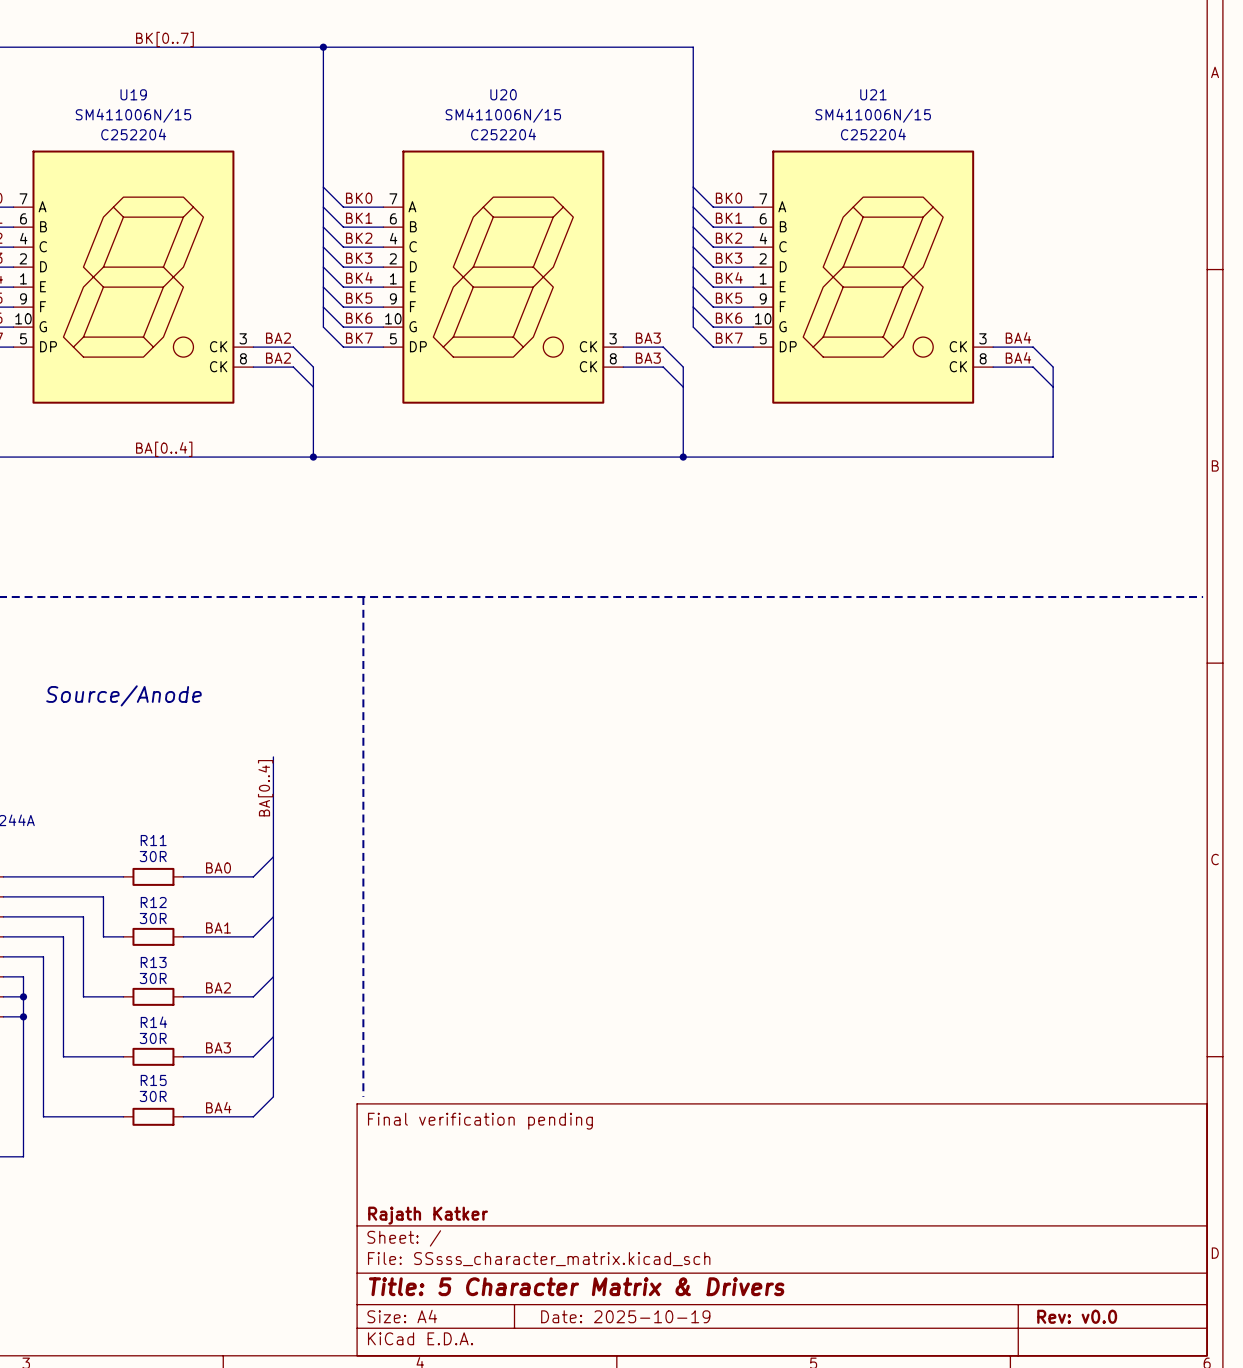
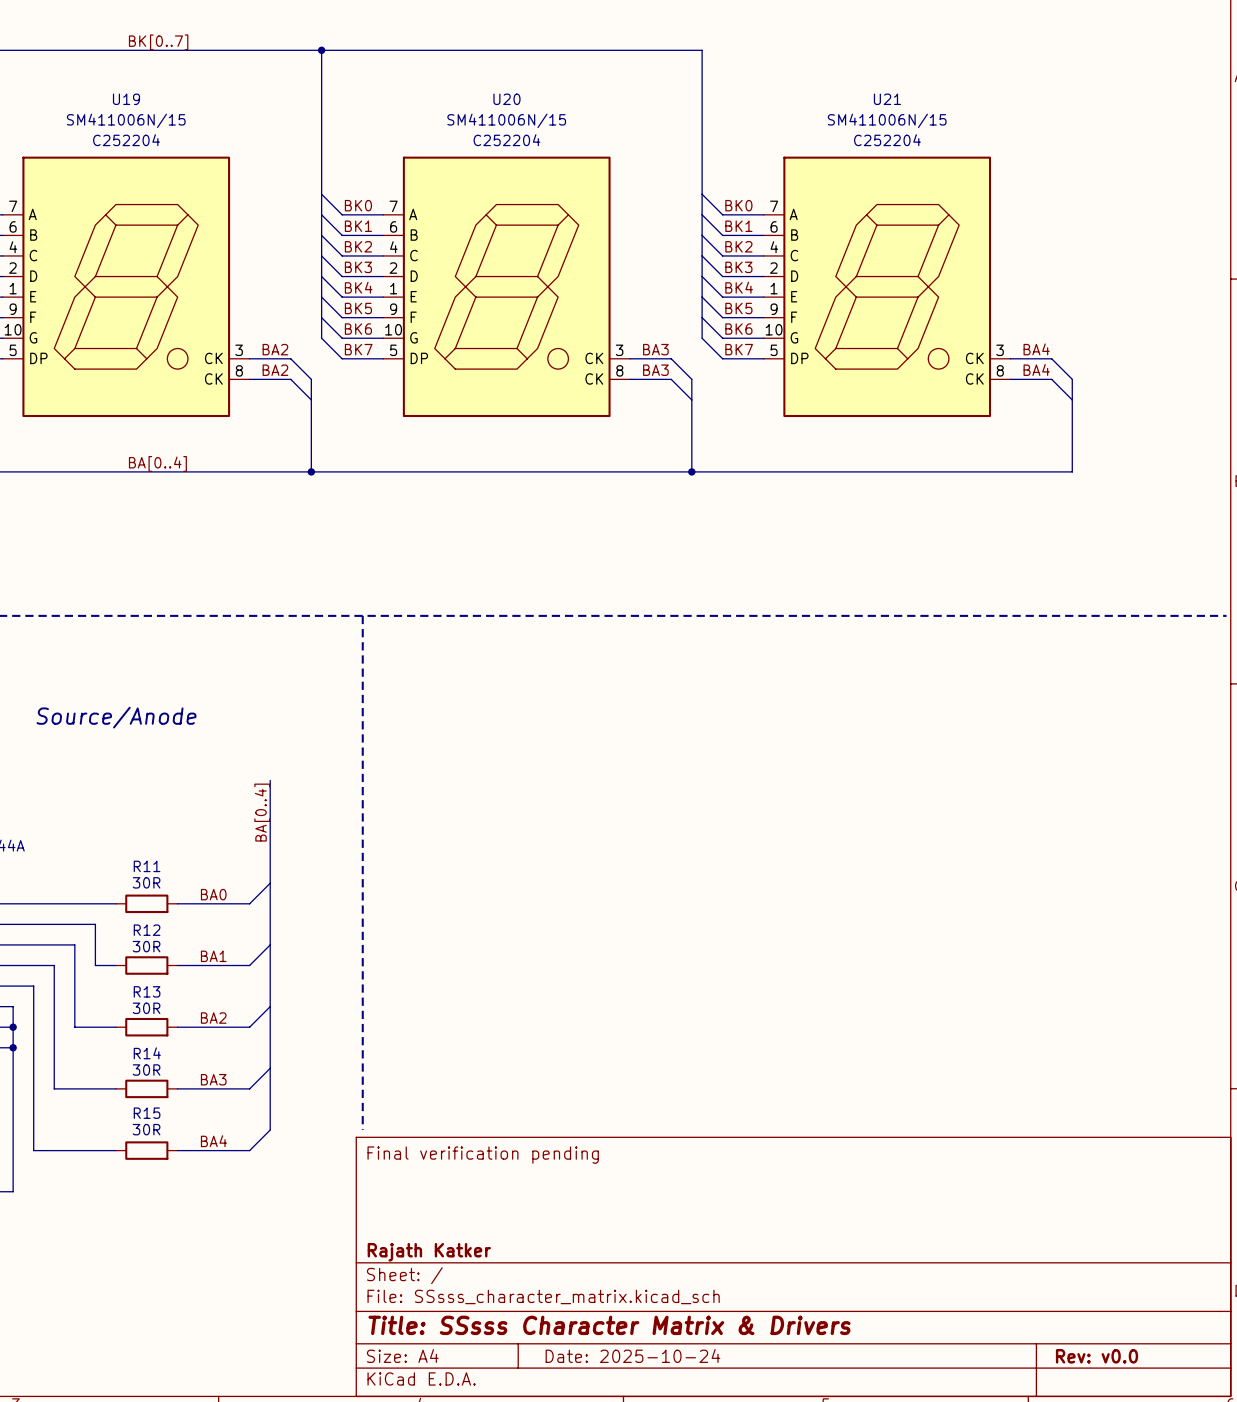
title block: Title: 5 Character Matrix & Drivers (576, 1286) -> Title: SSsss Character Matrix & Drivers (609, 1325)
title block: Date: 2025-10-19 (625, 1316) -> Date: 2025-10-24 (632, 1356)

